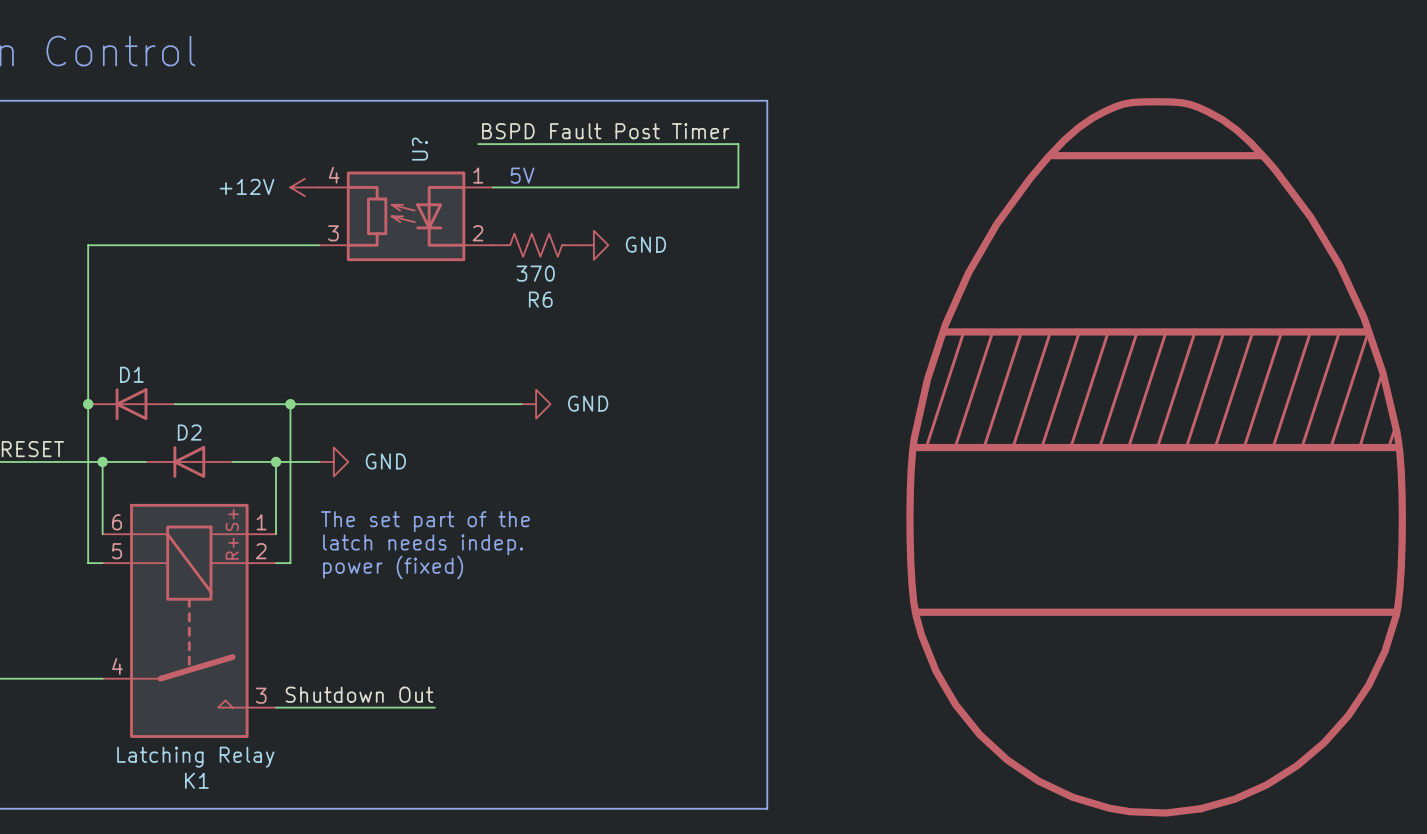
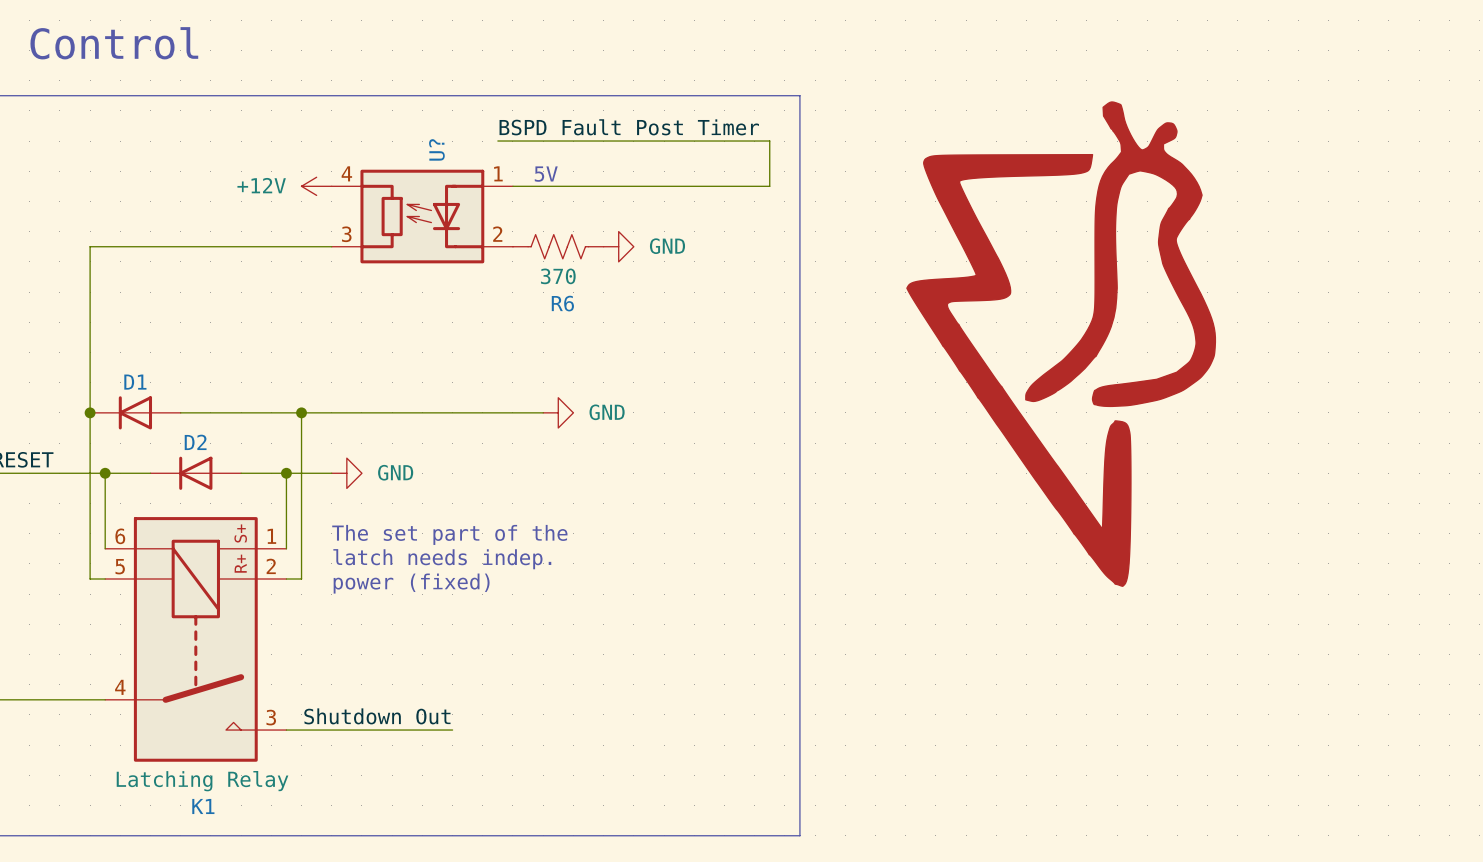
power symbol: none -> (1061, 344)
part: (1156, 457) -> none

